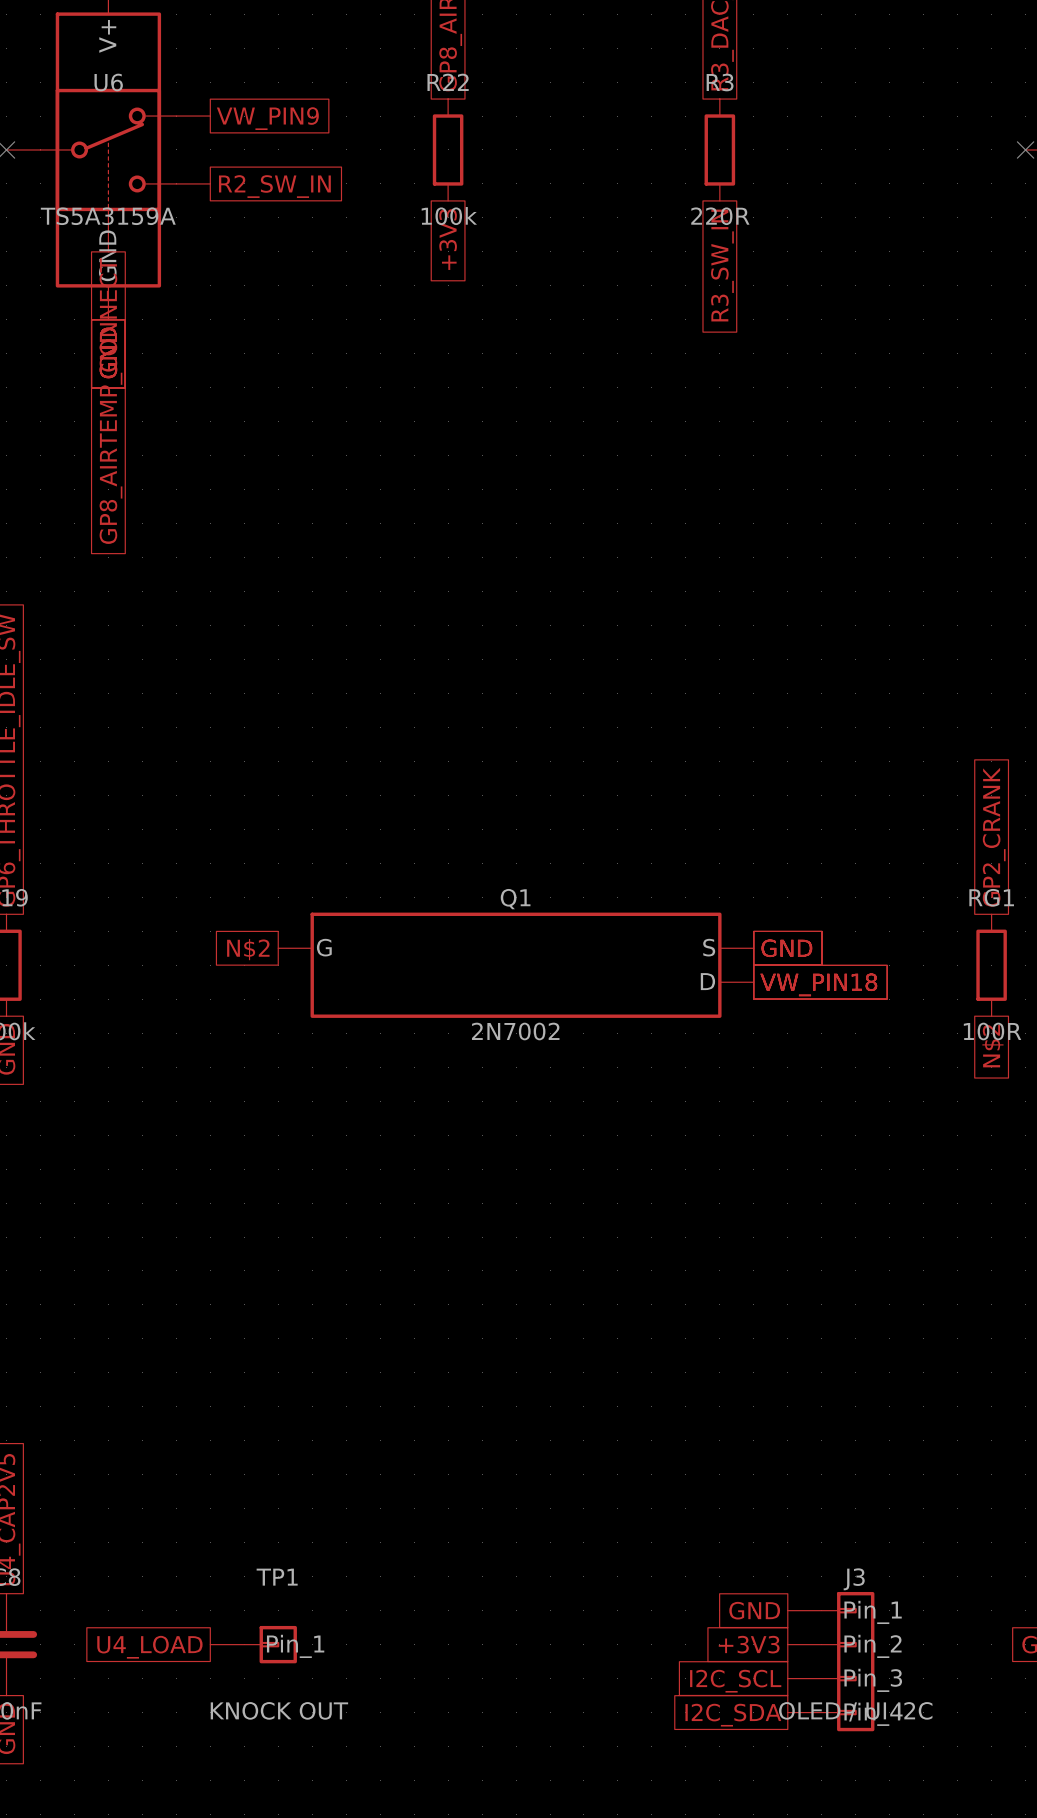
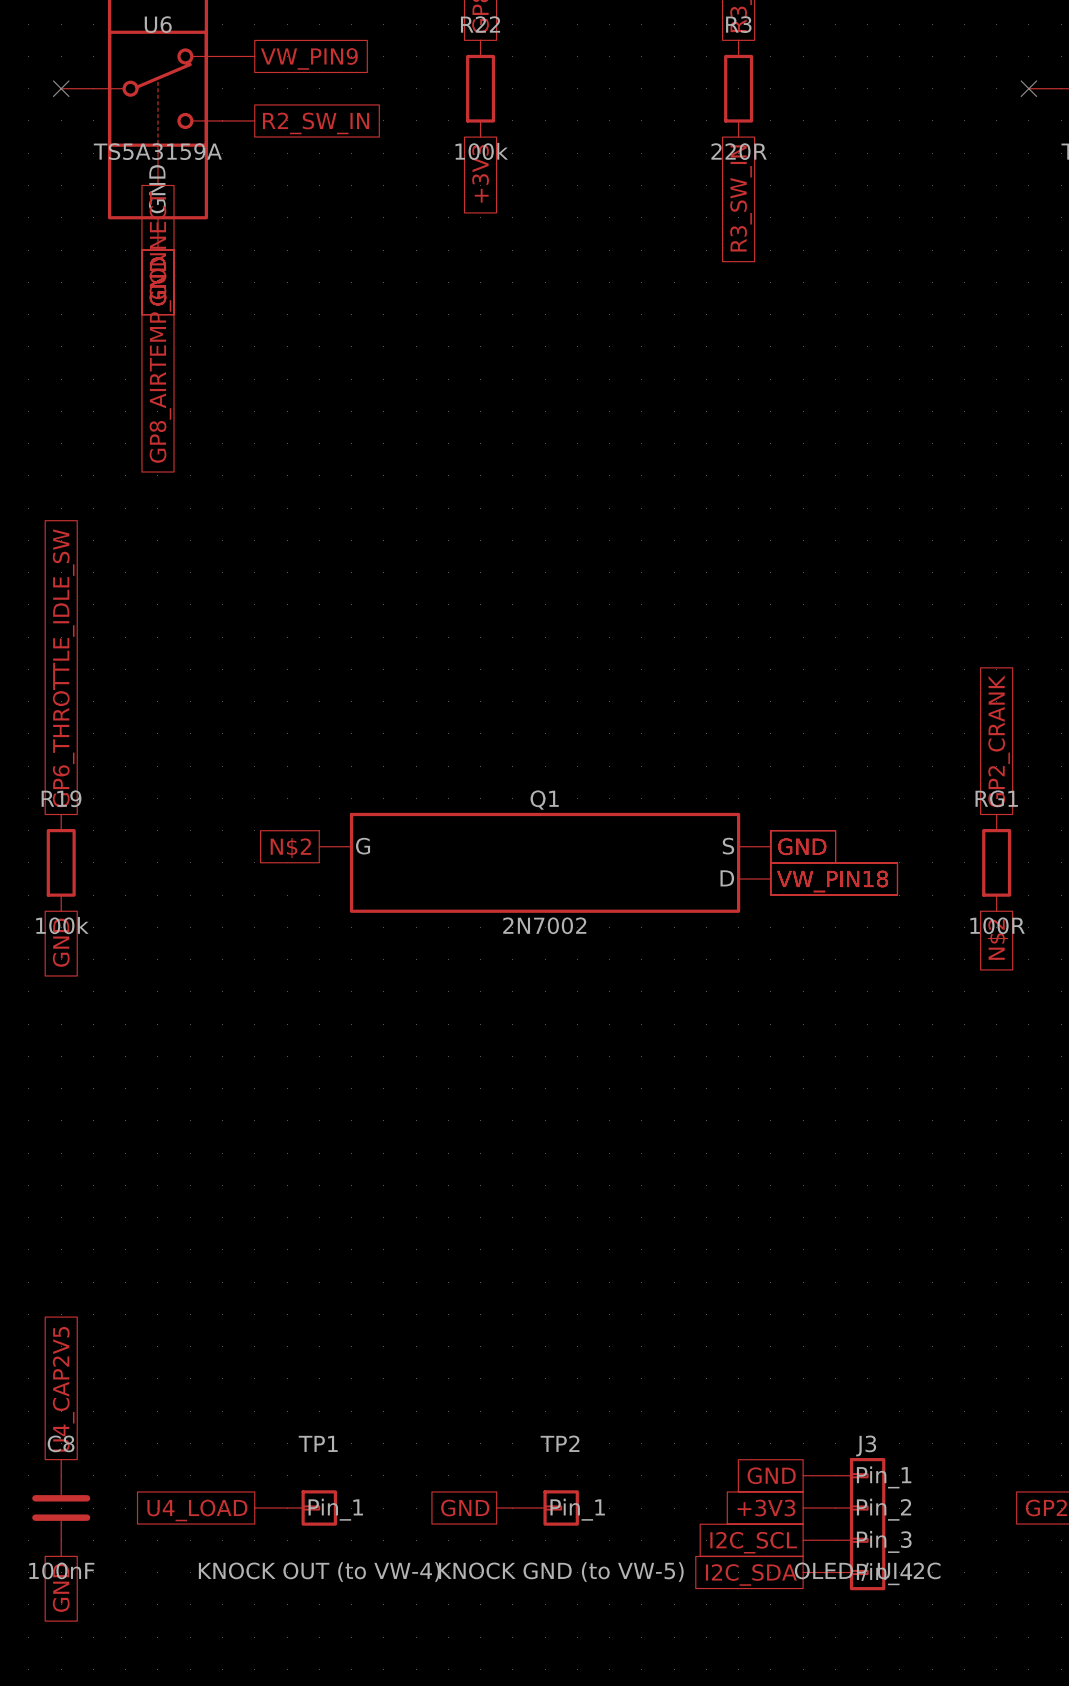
global label: none -> GND (465, 1508)
TP2: none -> KNOCK GND (to VW-5) (537, 1508)
TP1 value: KNOCK OUT (279, 1710) -> KNOCK OUT (to VW-4) (319, 1572)

